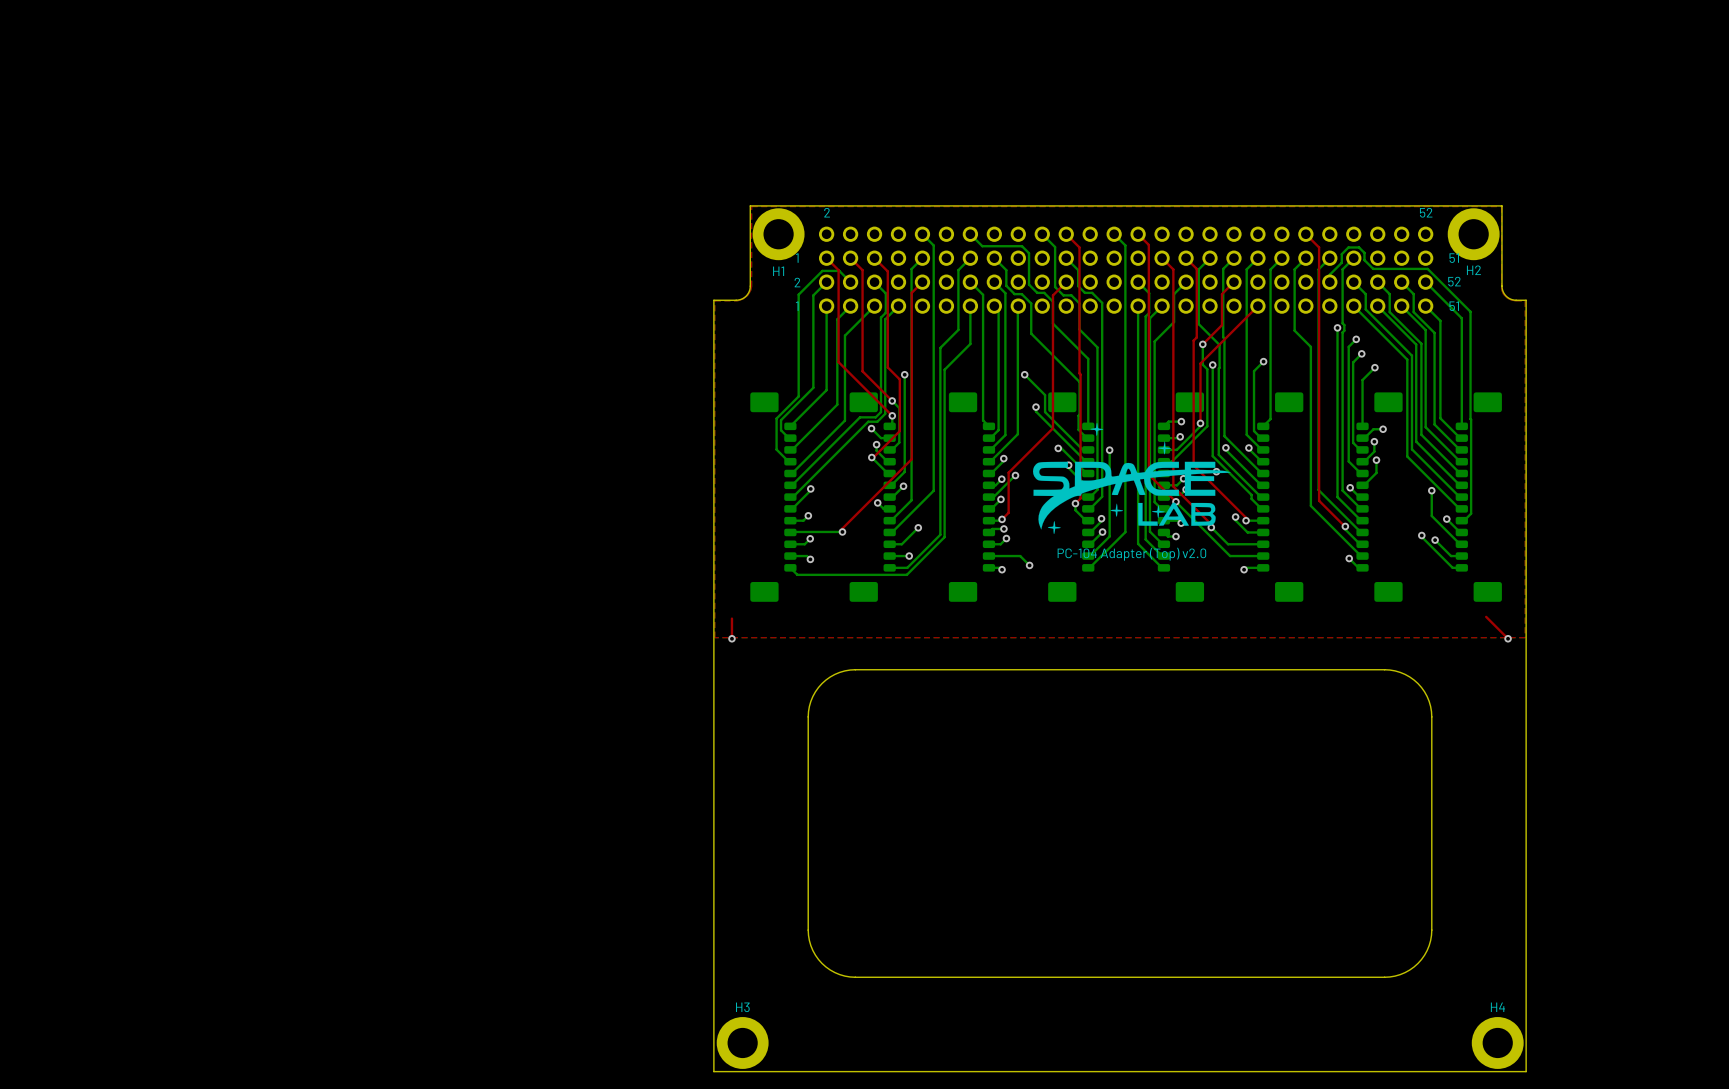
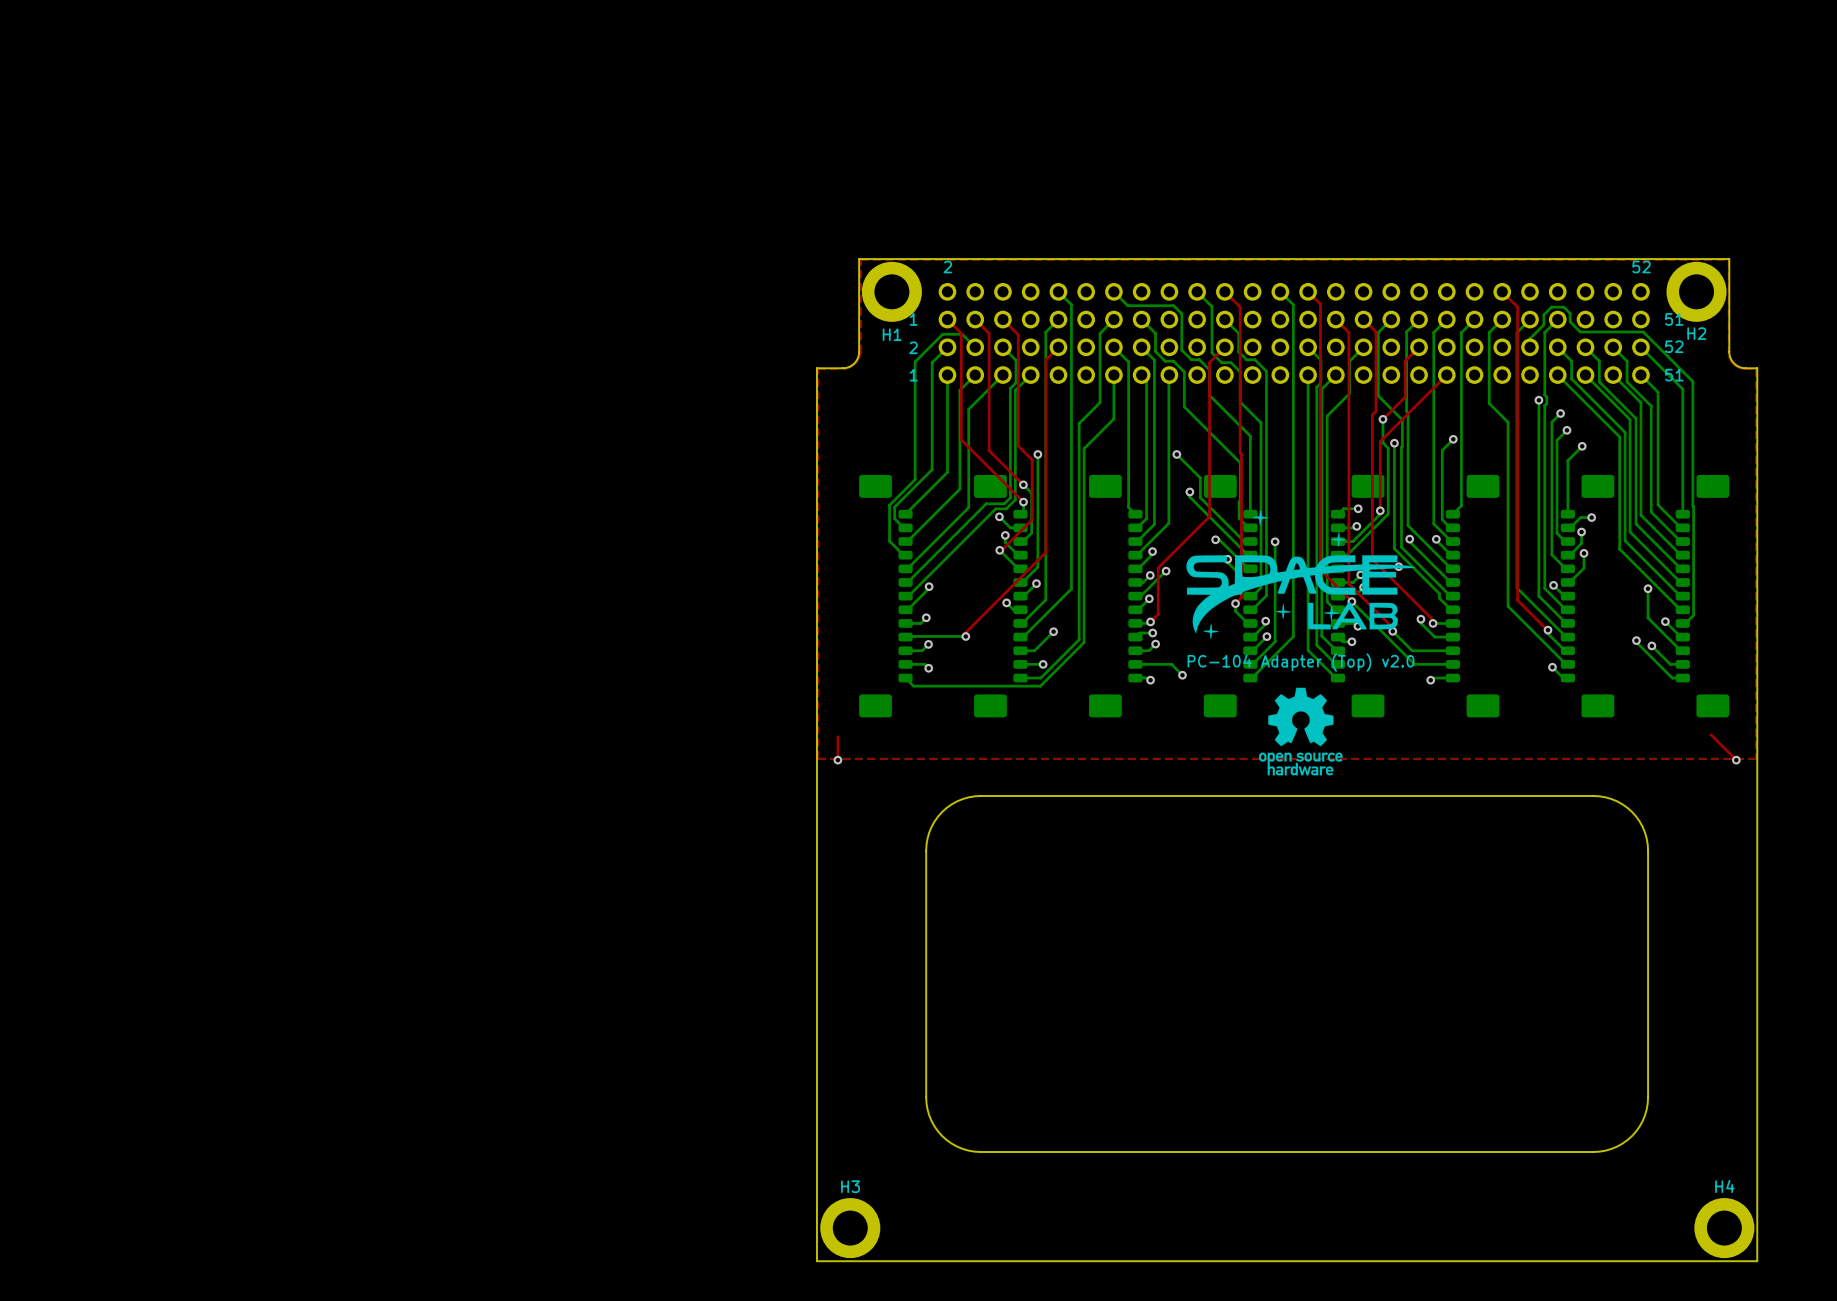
drawing: none -> [1259, 687, 1343, 776]

